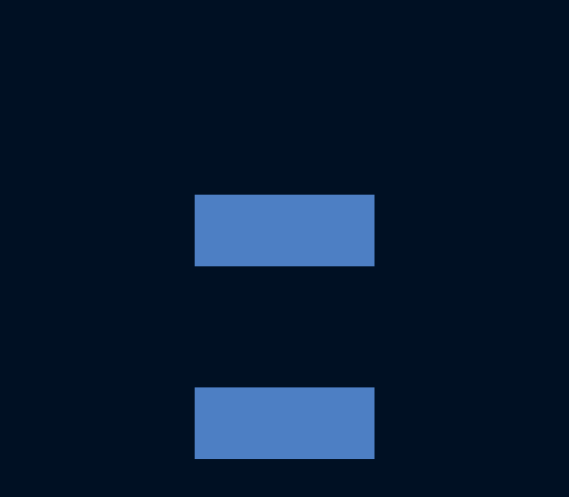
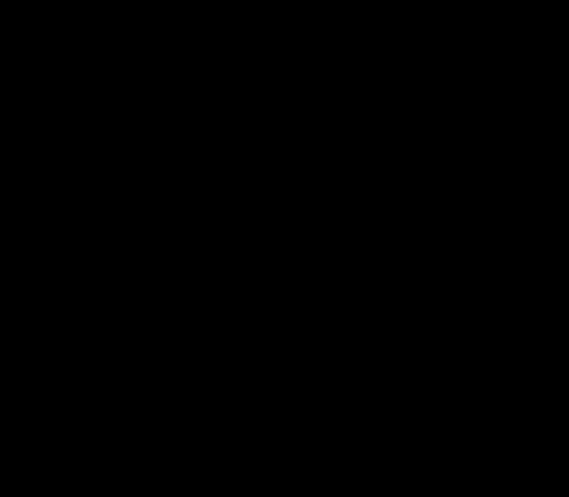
part: (284, 326) -> none

